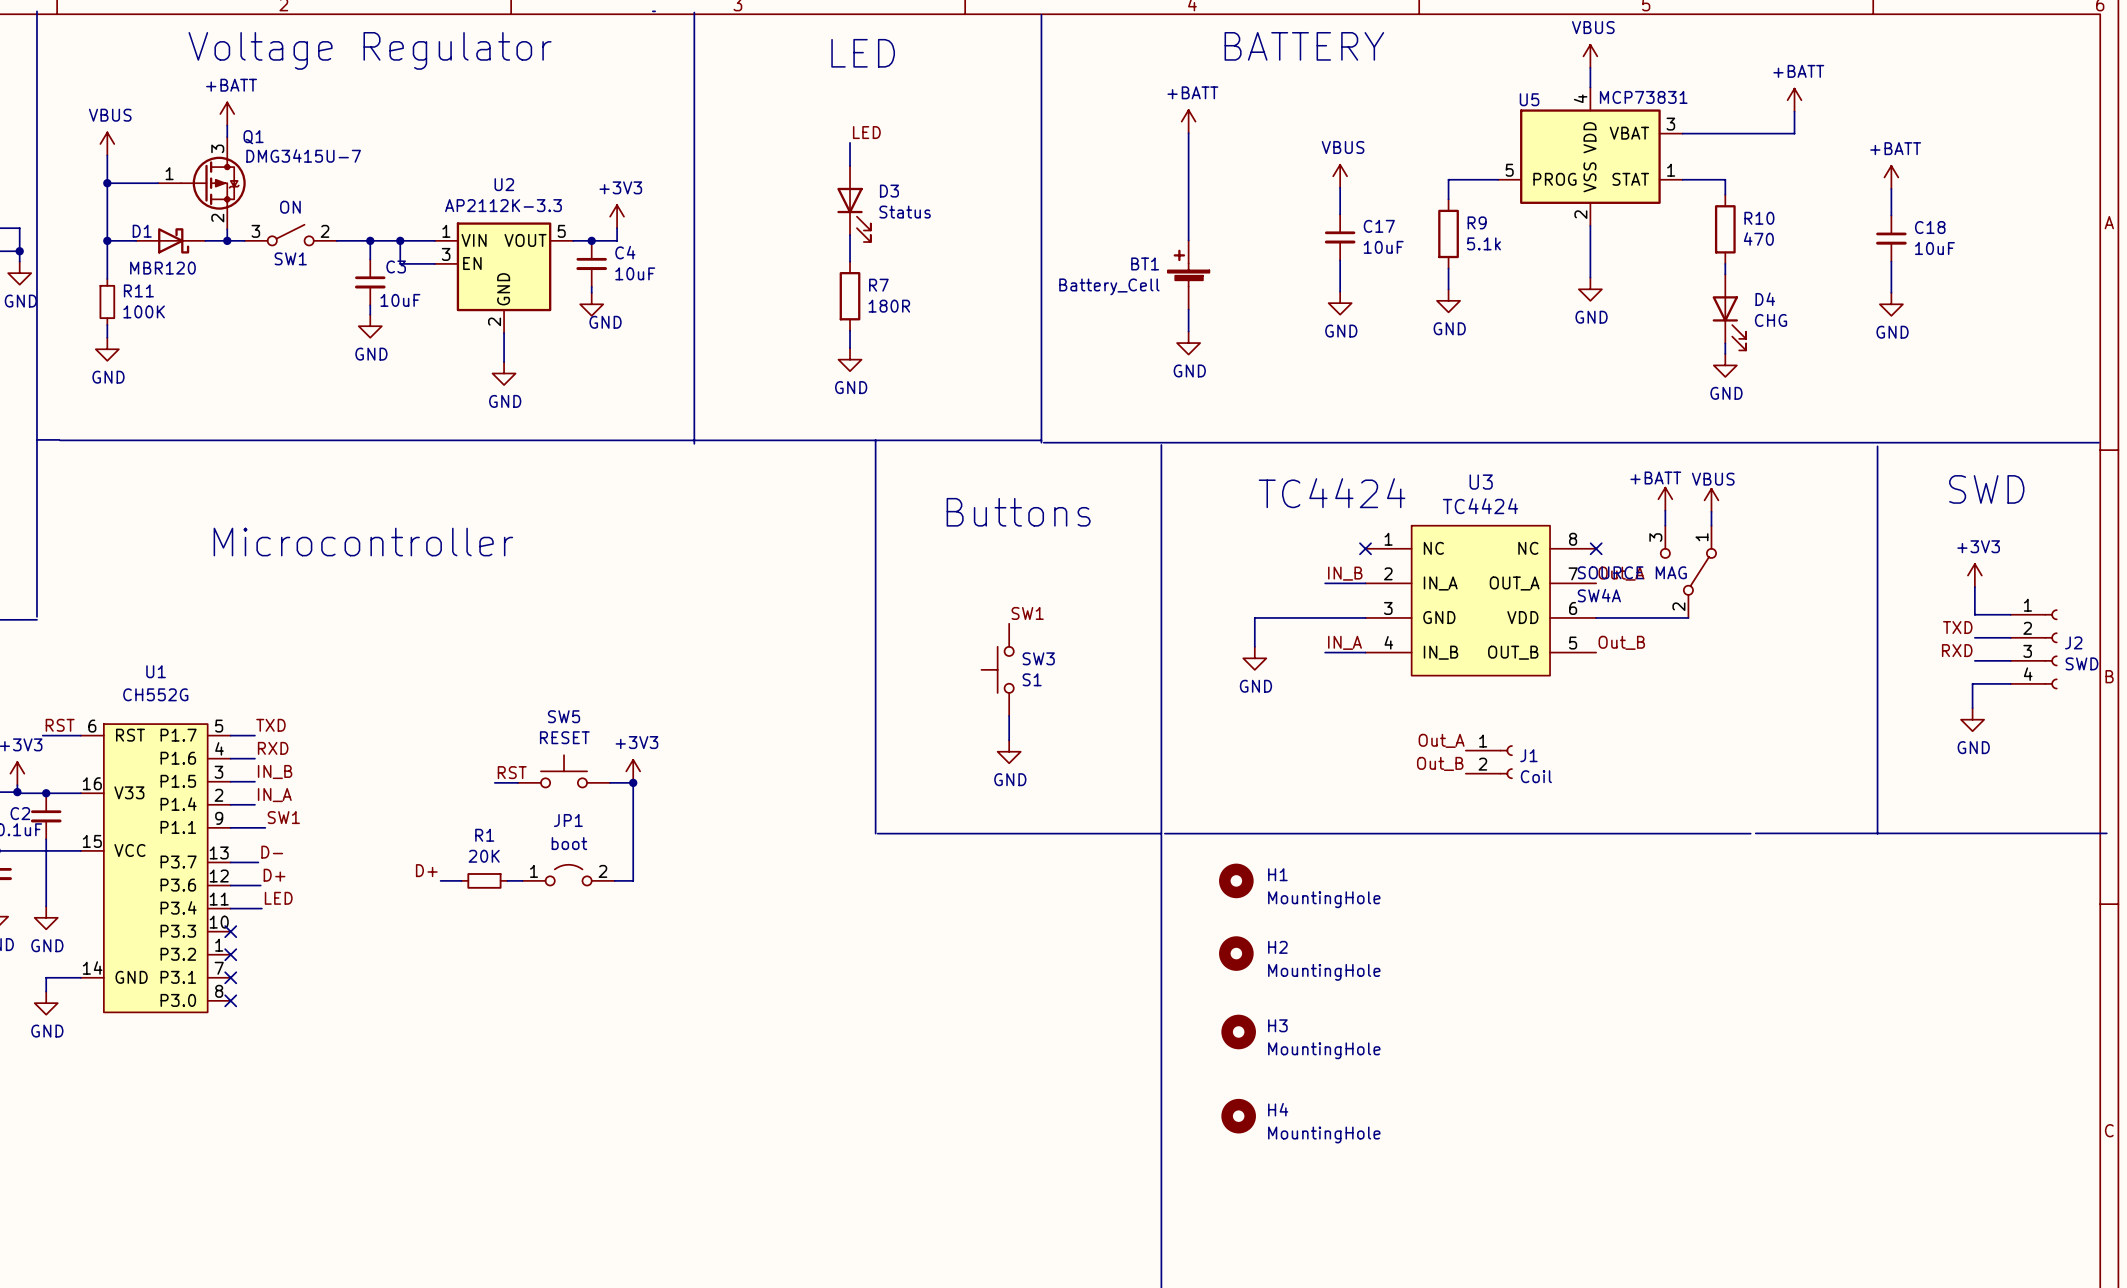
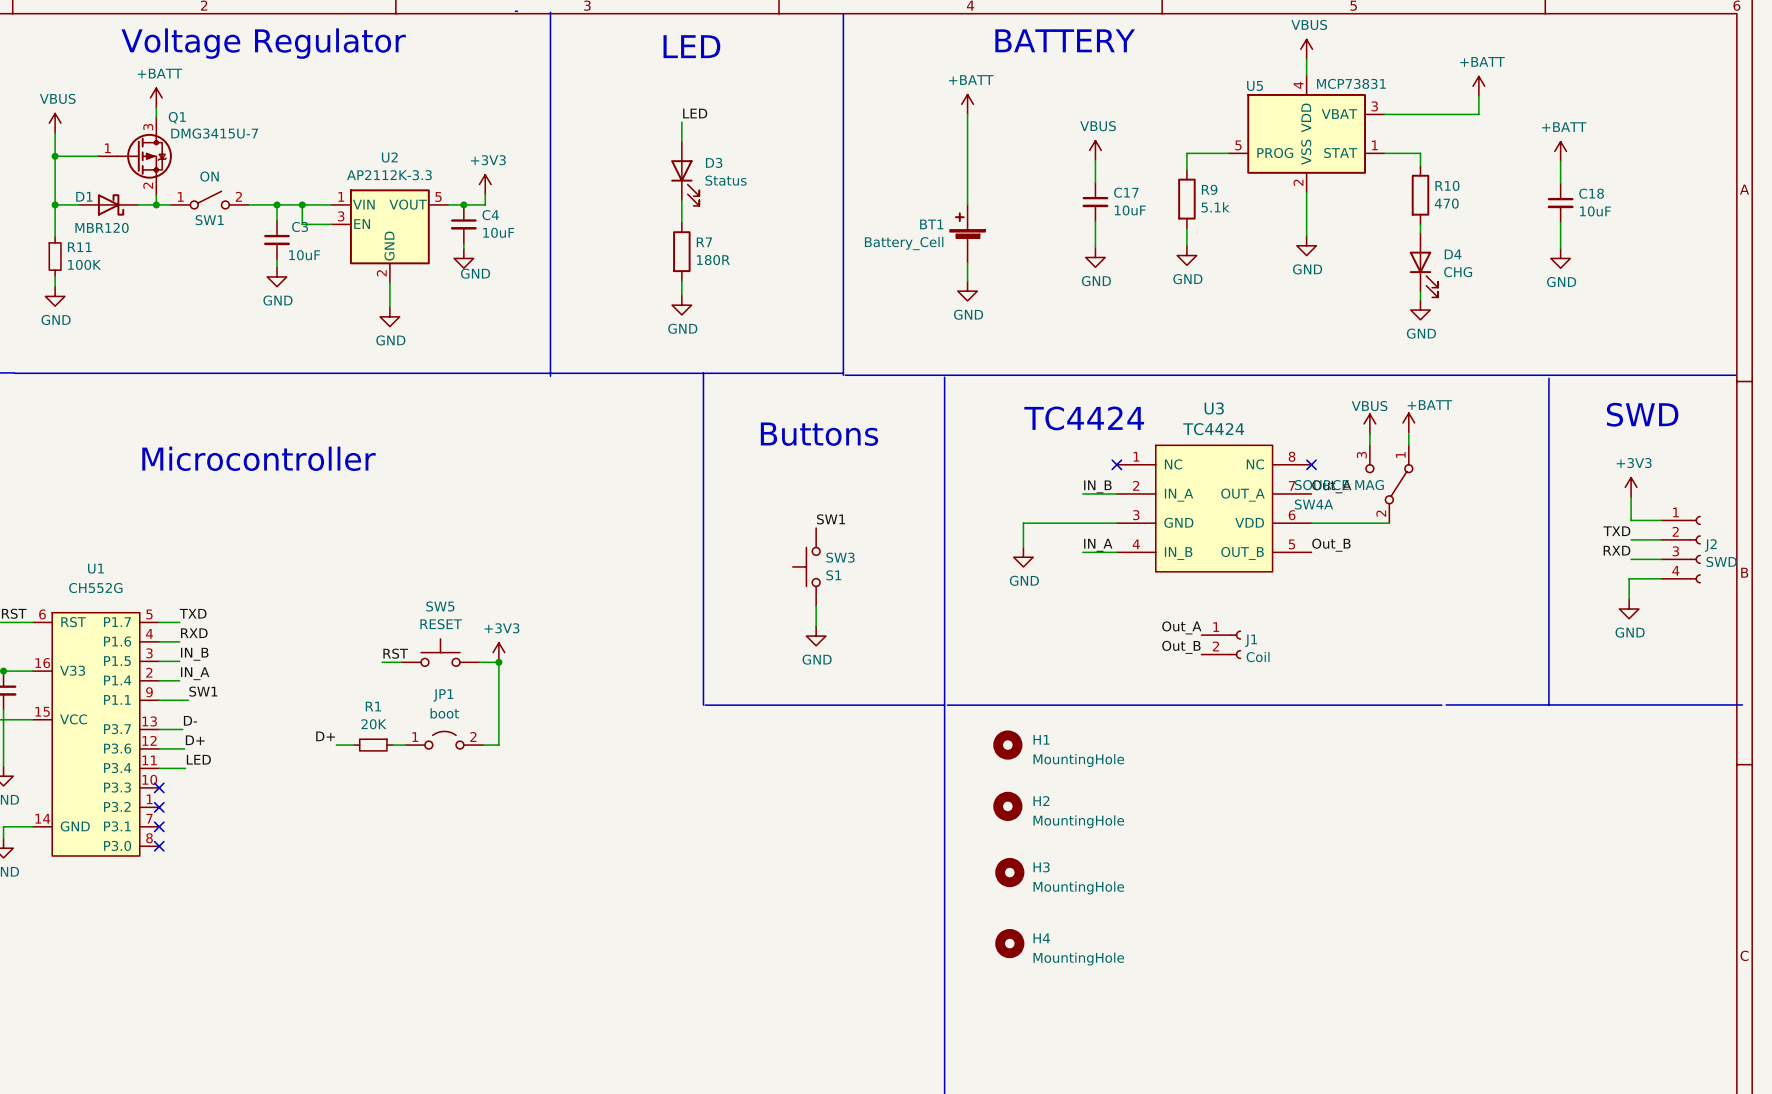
SW1 pin number: 3 (255, 231) -> 1 (180, 196)
power symbol: +BATT (1665, 499) -> VBUS (1369, 423)
power symbol: VBUS (1711, 500) -> +BATT (1408, 422)

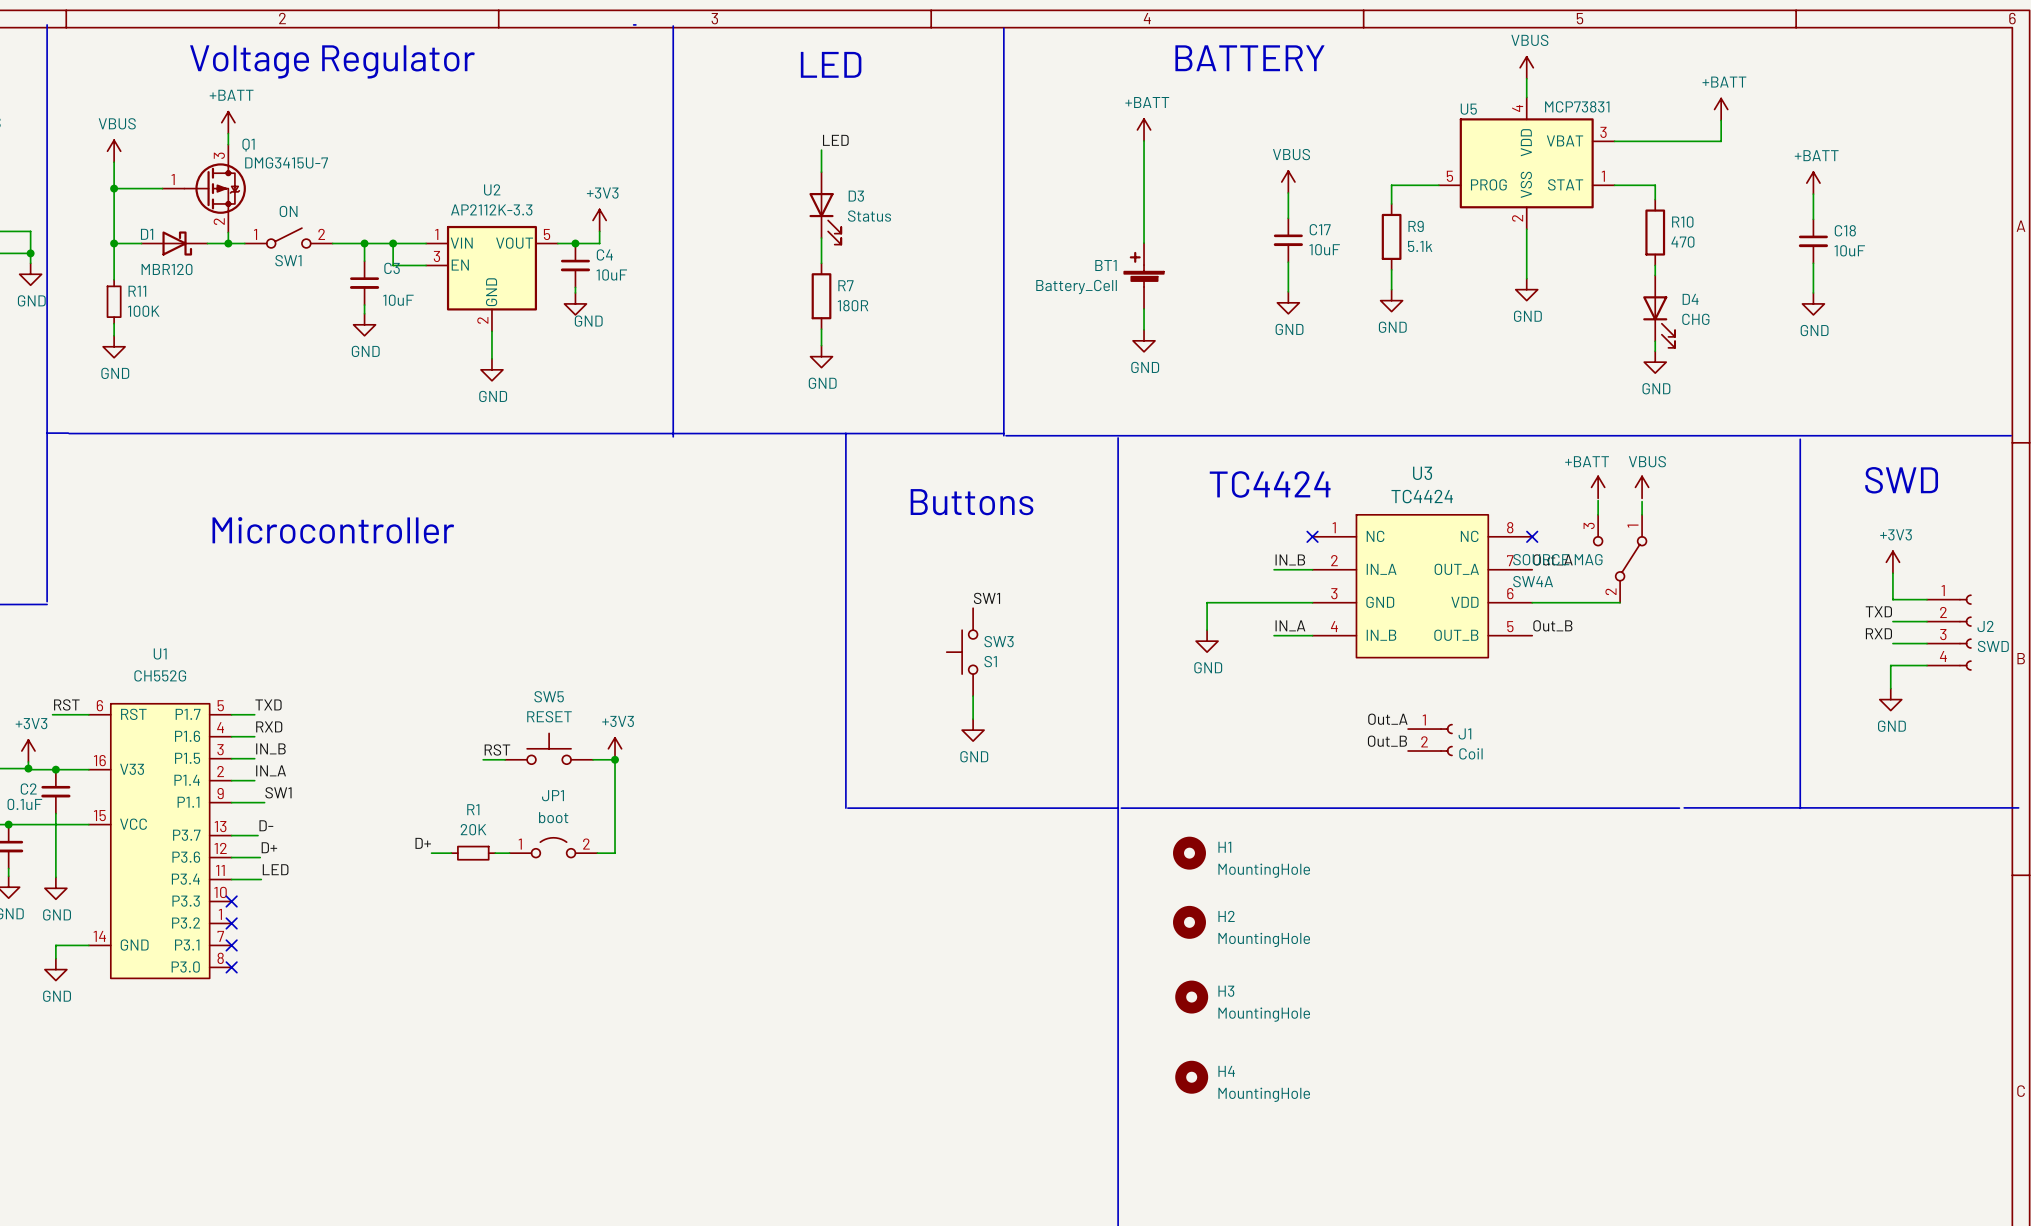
power symbol: +BATT (1408, 422) -> VBUS (1642, 487)
power symbol: VBUS (1369, 423) -> +BATT (1598, 487)

